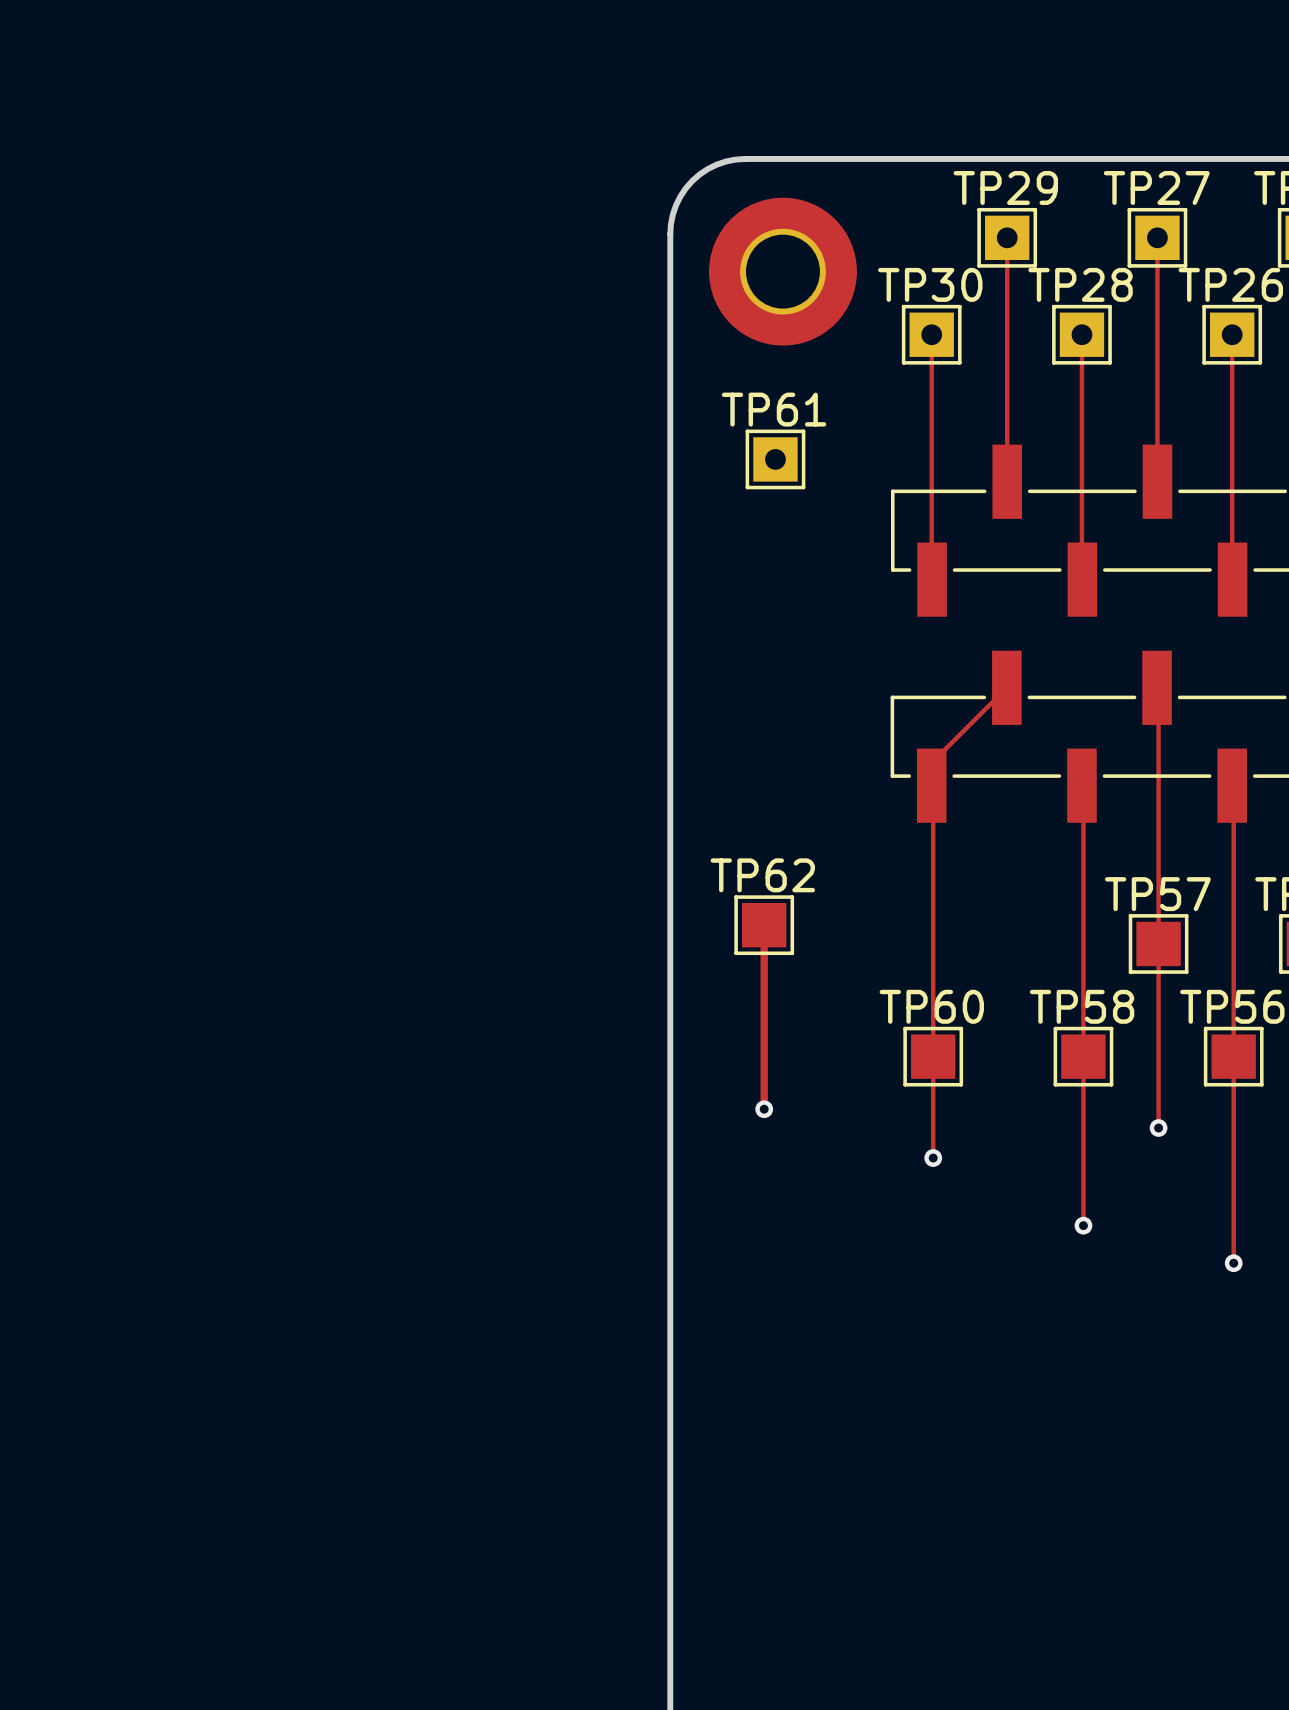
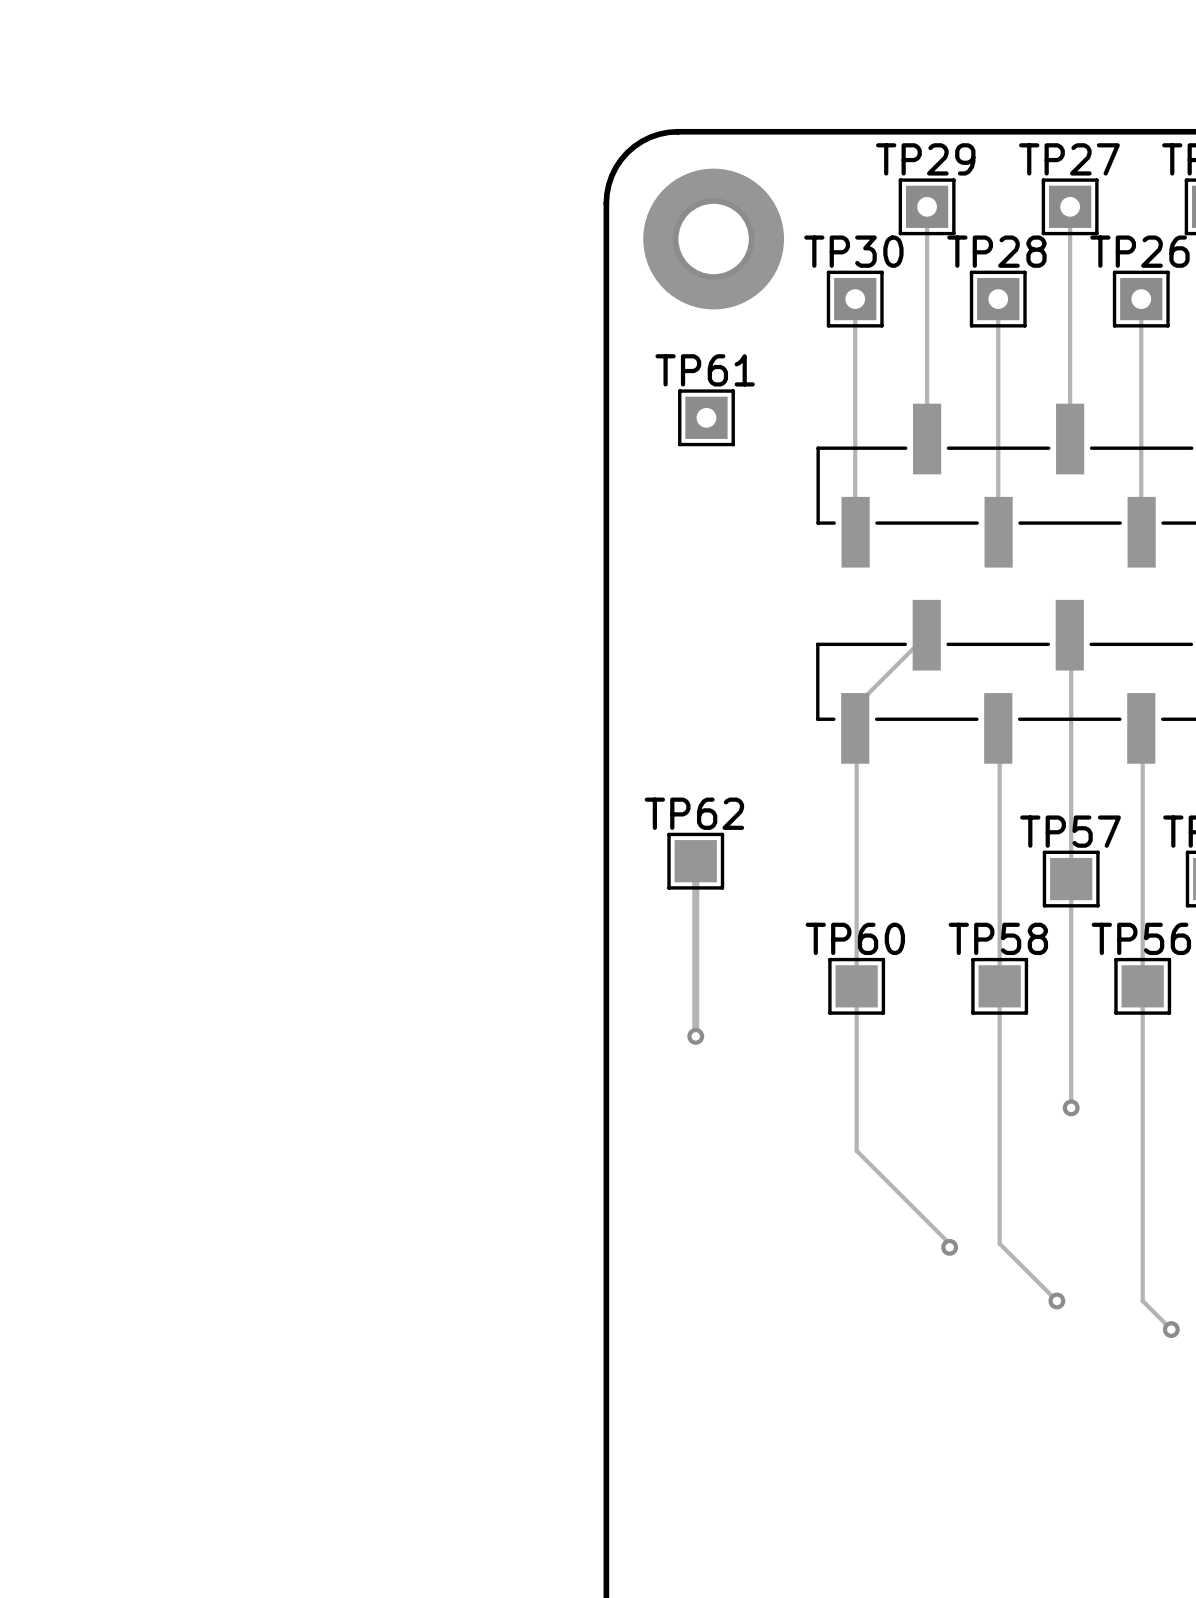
track: none -> (1071, 1054) (1071, 1107)
via: (1158, 1128) -> none
track: none -> (856, 1082) (856, 1150) (949, 1243) (949, 1247)
via: (933, 1158) -> none
via: none -> (1071, 1107)
track: none -> (999, 1147) (999, 1243) (1056, 1300)
via: (1083, 1225) -> none
track: none -> (1142, 1182) (1142, 1300) (1171, 1329)
via: (1233, 1263) -> none
via: none -> (949, 1247)
via: none -> (1056, 1300)
via: none -> (1171, 1329)

